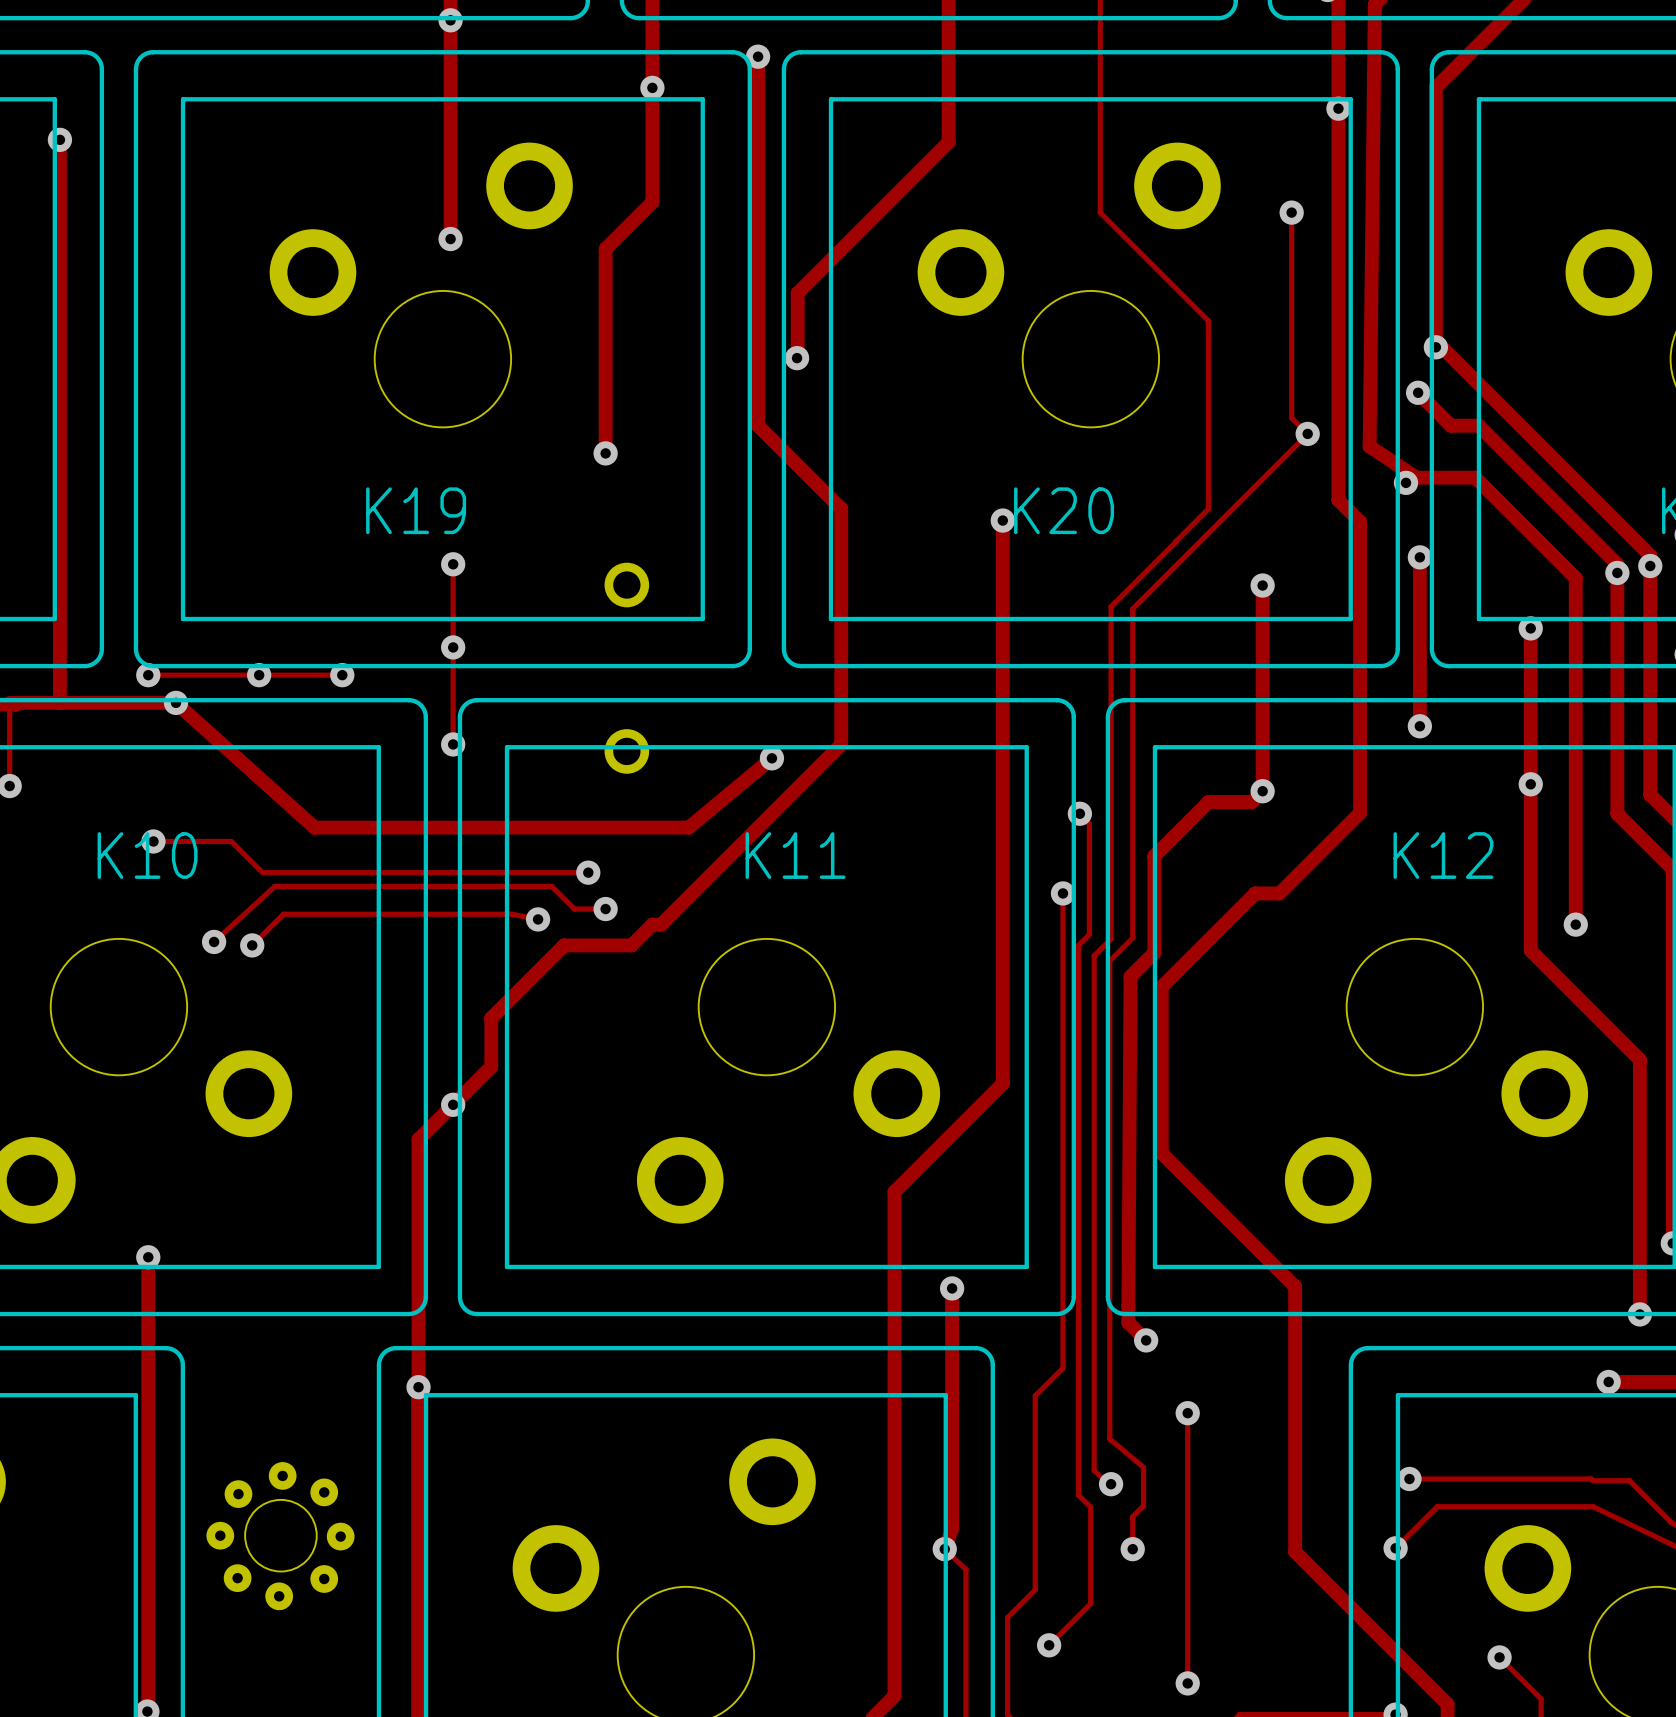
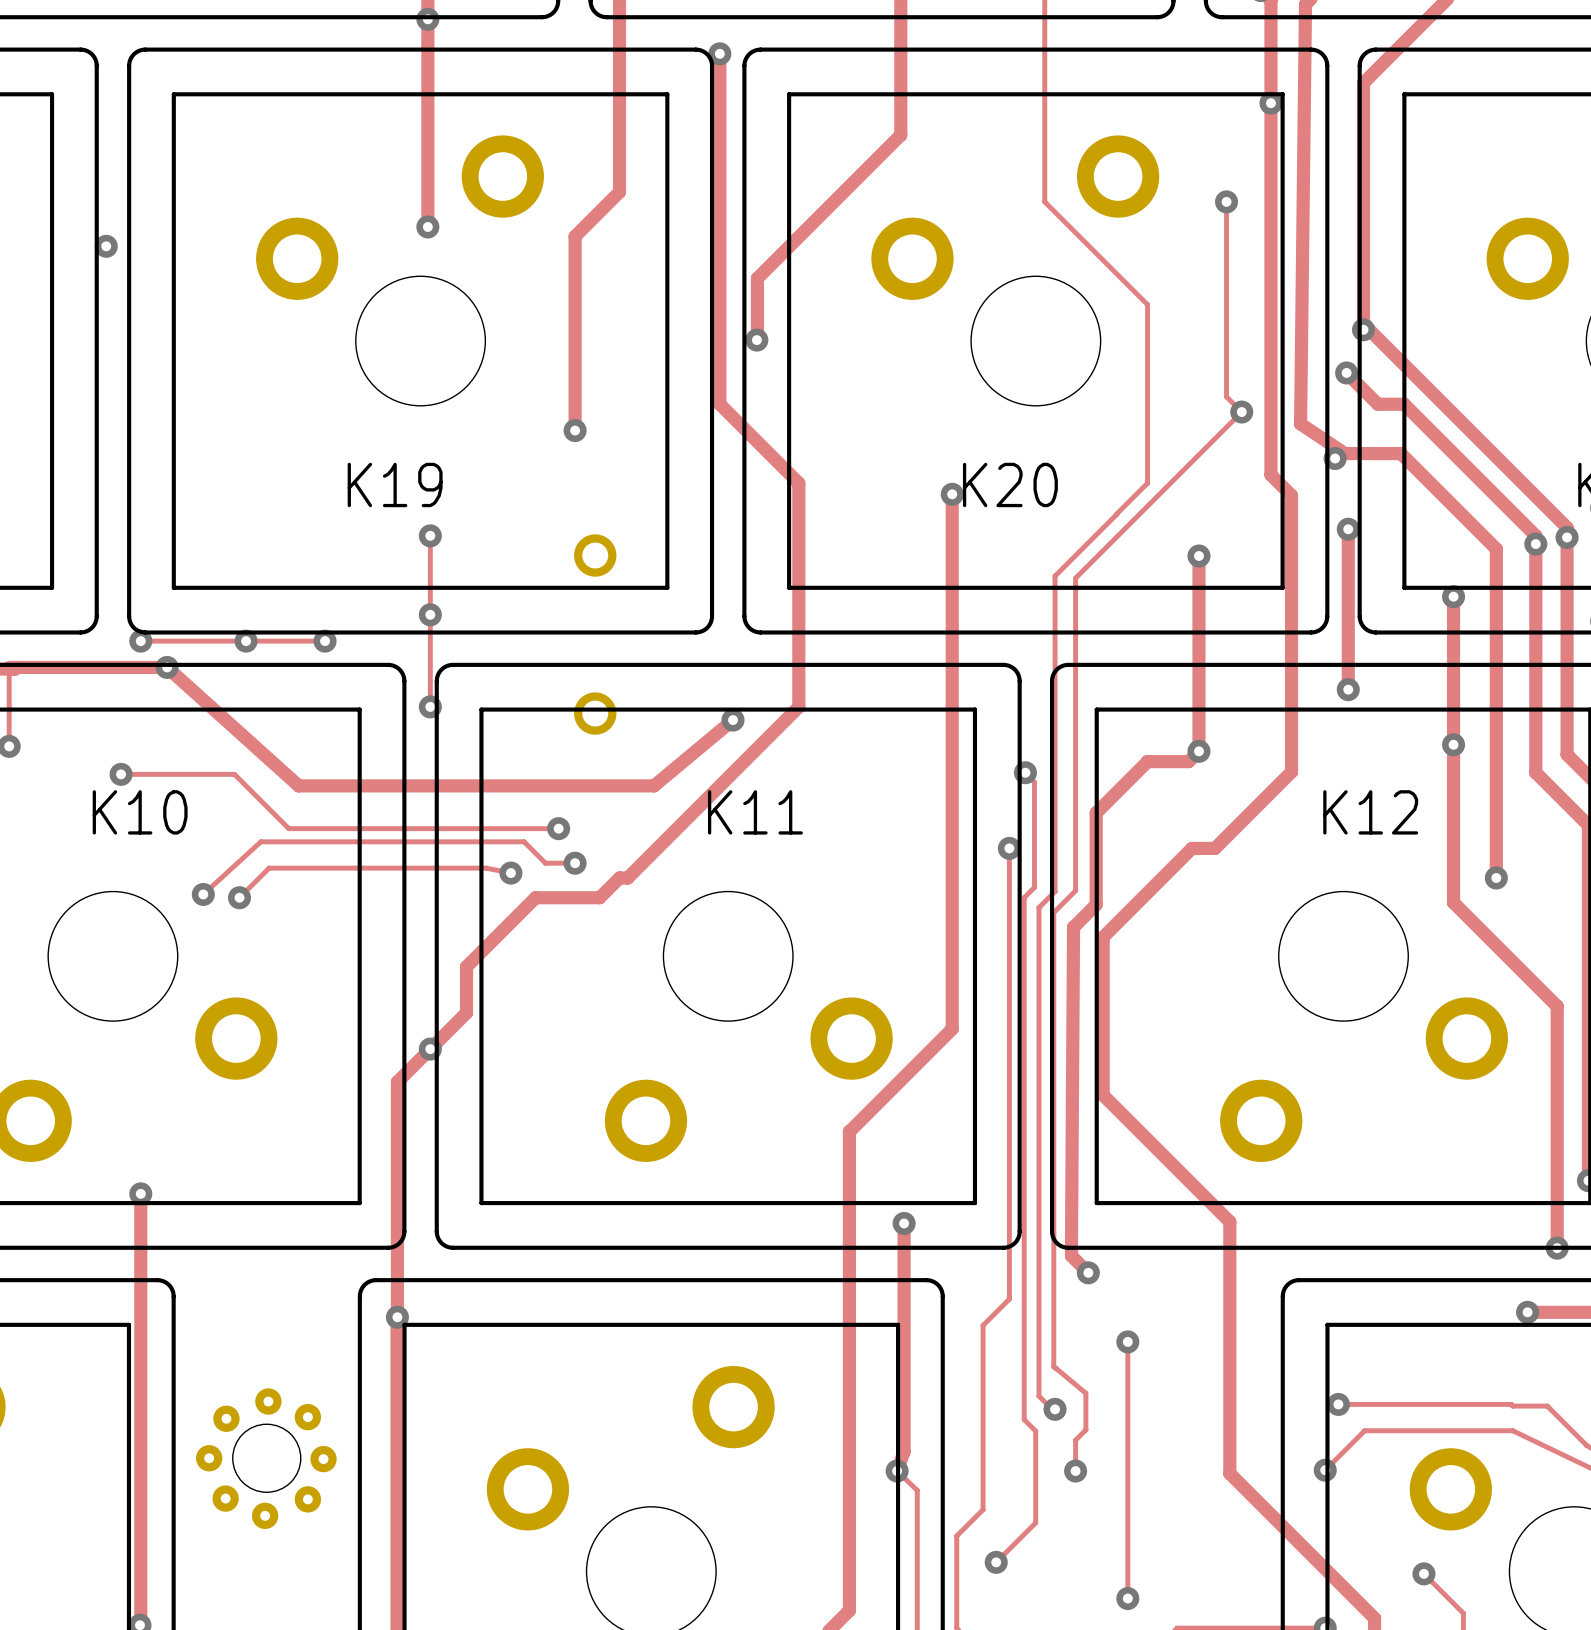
via: (652, 87) -> none
track: (59, 139) (59, 702) -> none
via position: (59, 139) -> (106, 246)
track: (153, 841) (231, 841) (262, 872) (304, 872) -> (121, 774) (234, 774) (288, 828)
via position: (153, 841) -> (121, 774)

